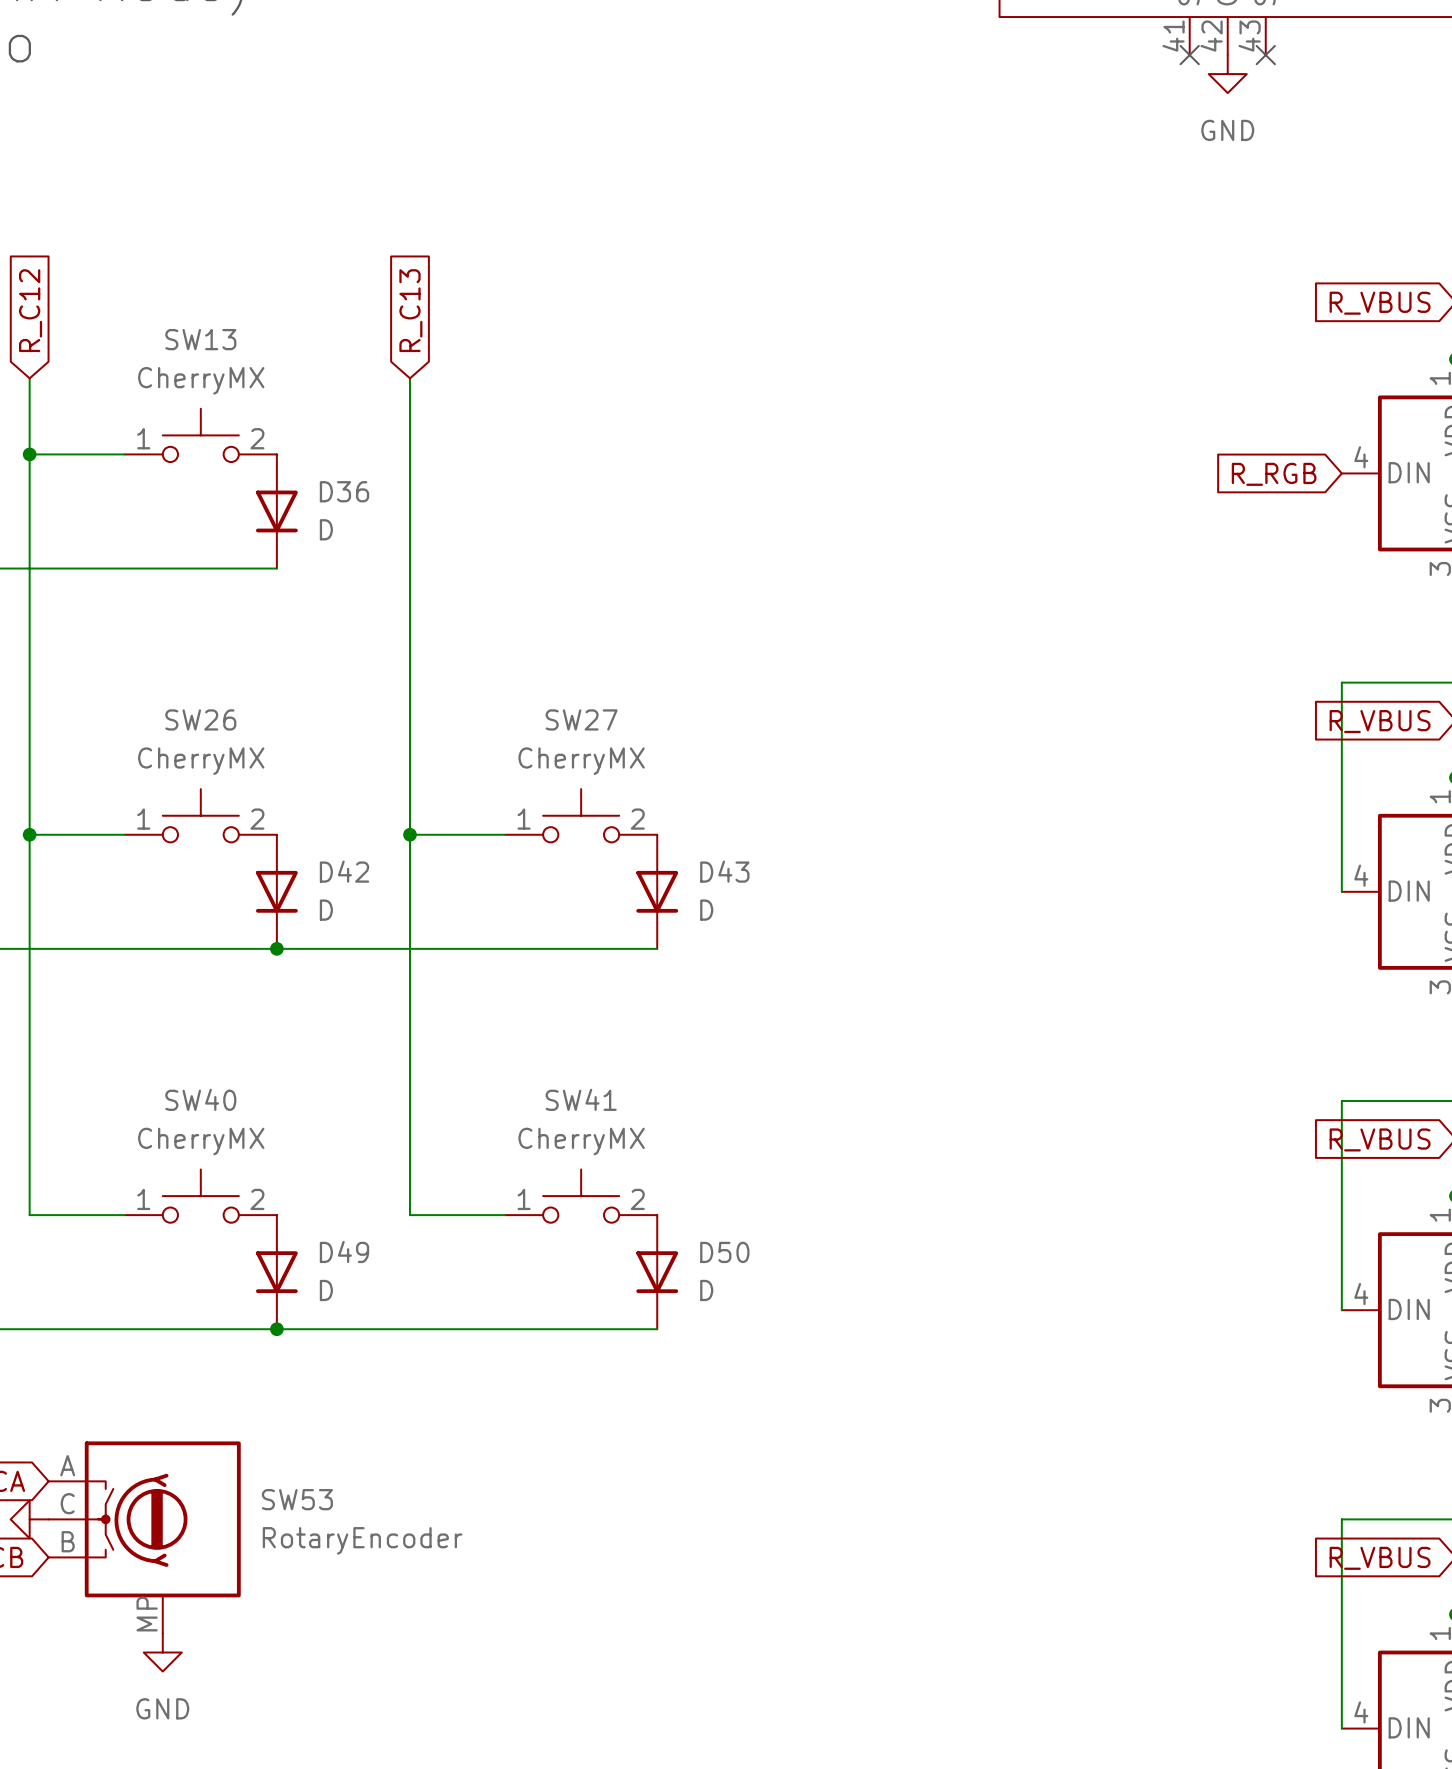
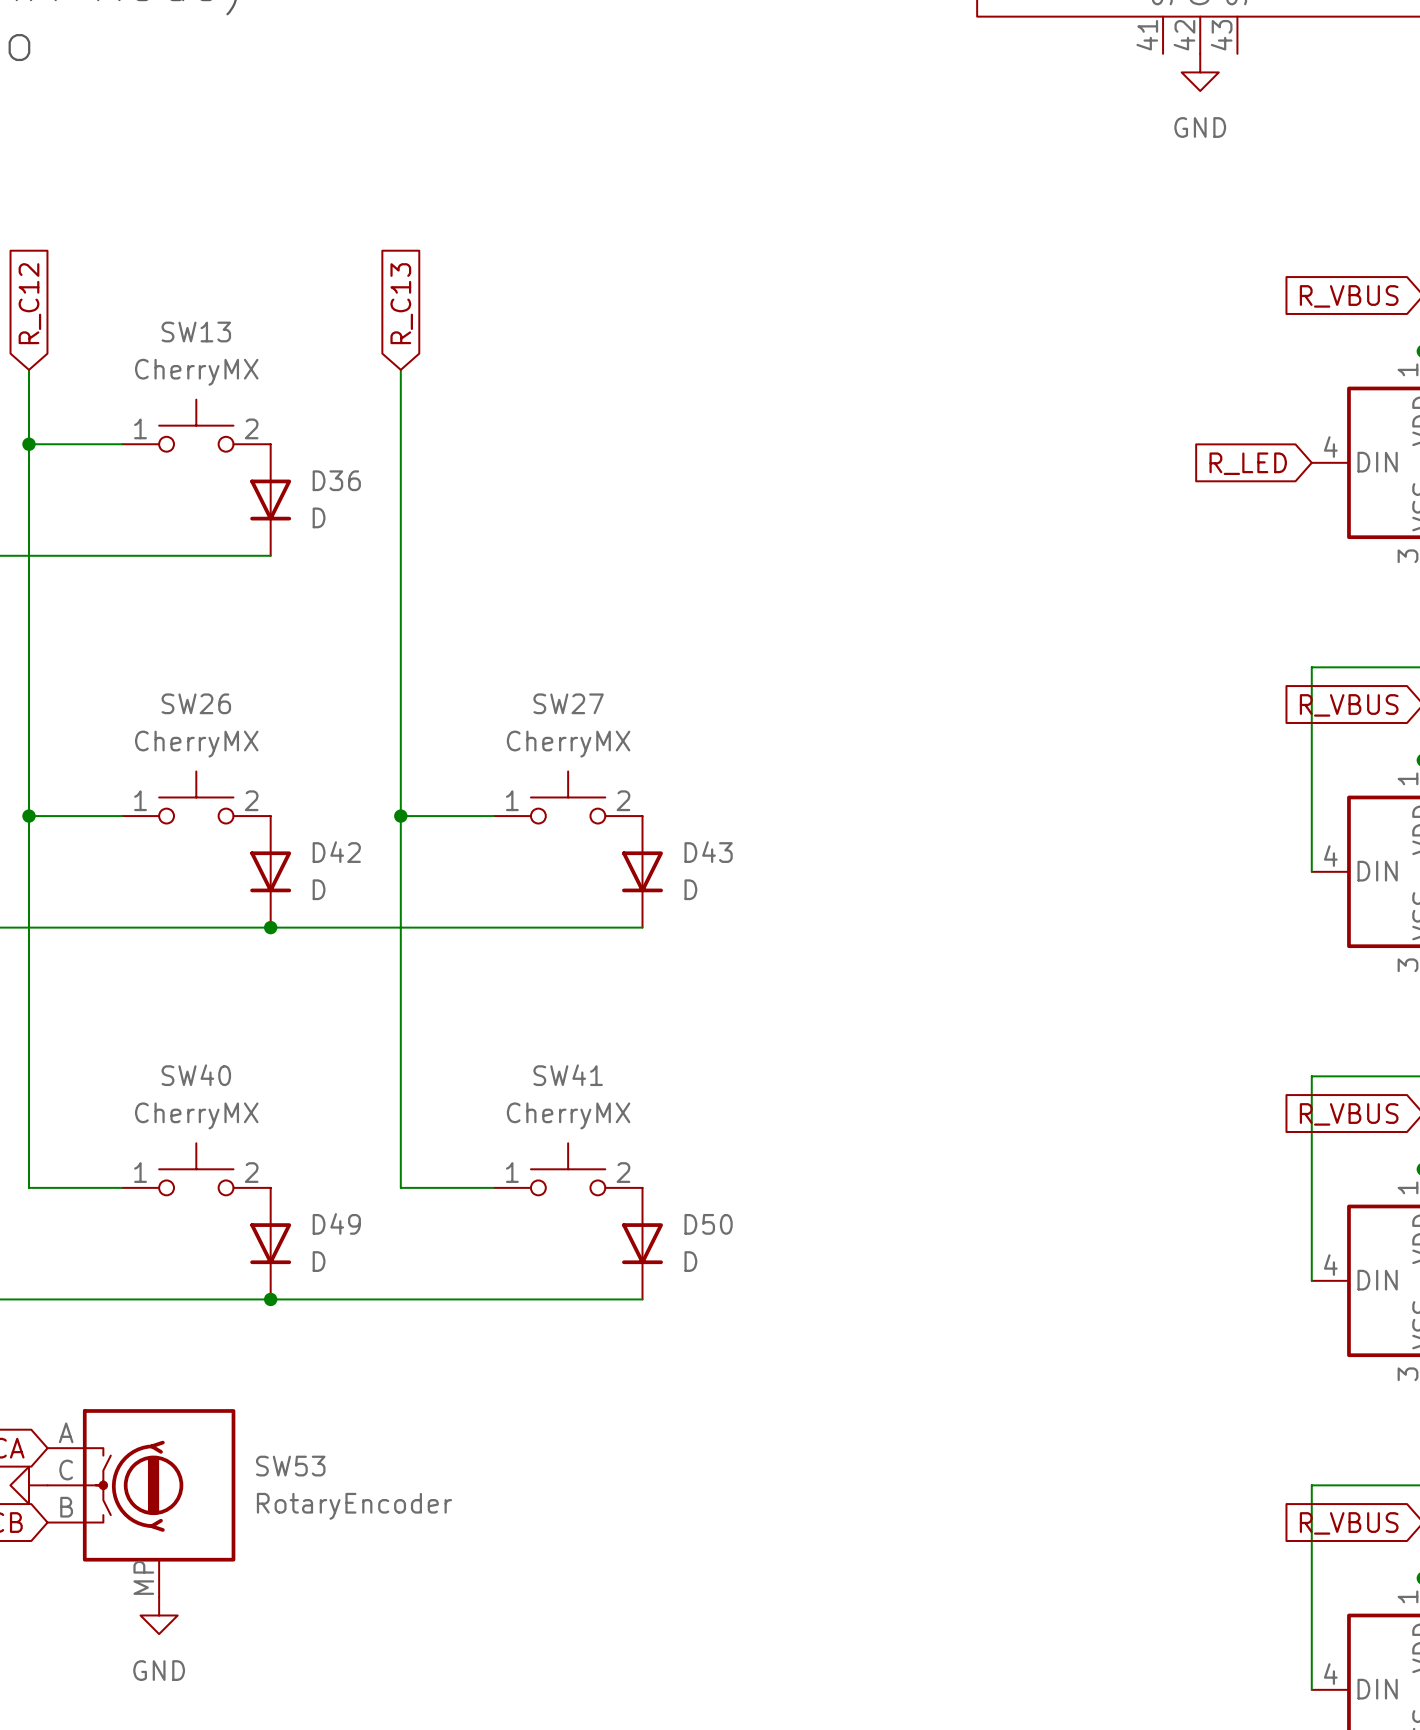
no-connect mark: (1189, 55) -> none
no-connect mark: (1265, 55) -> none
global label: R_RGB (1274, 474) -> R_LED (1248, 463)

